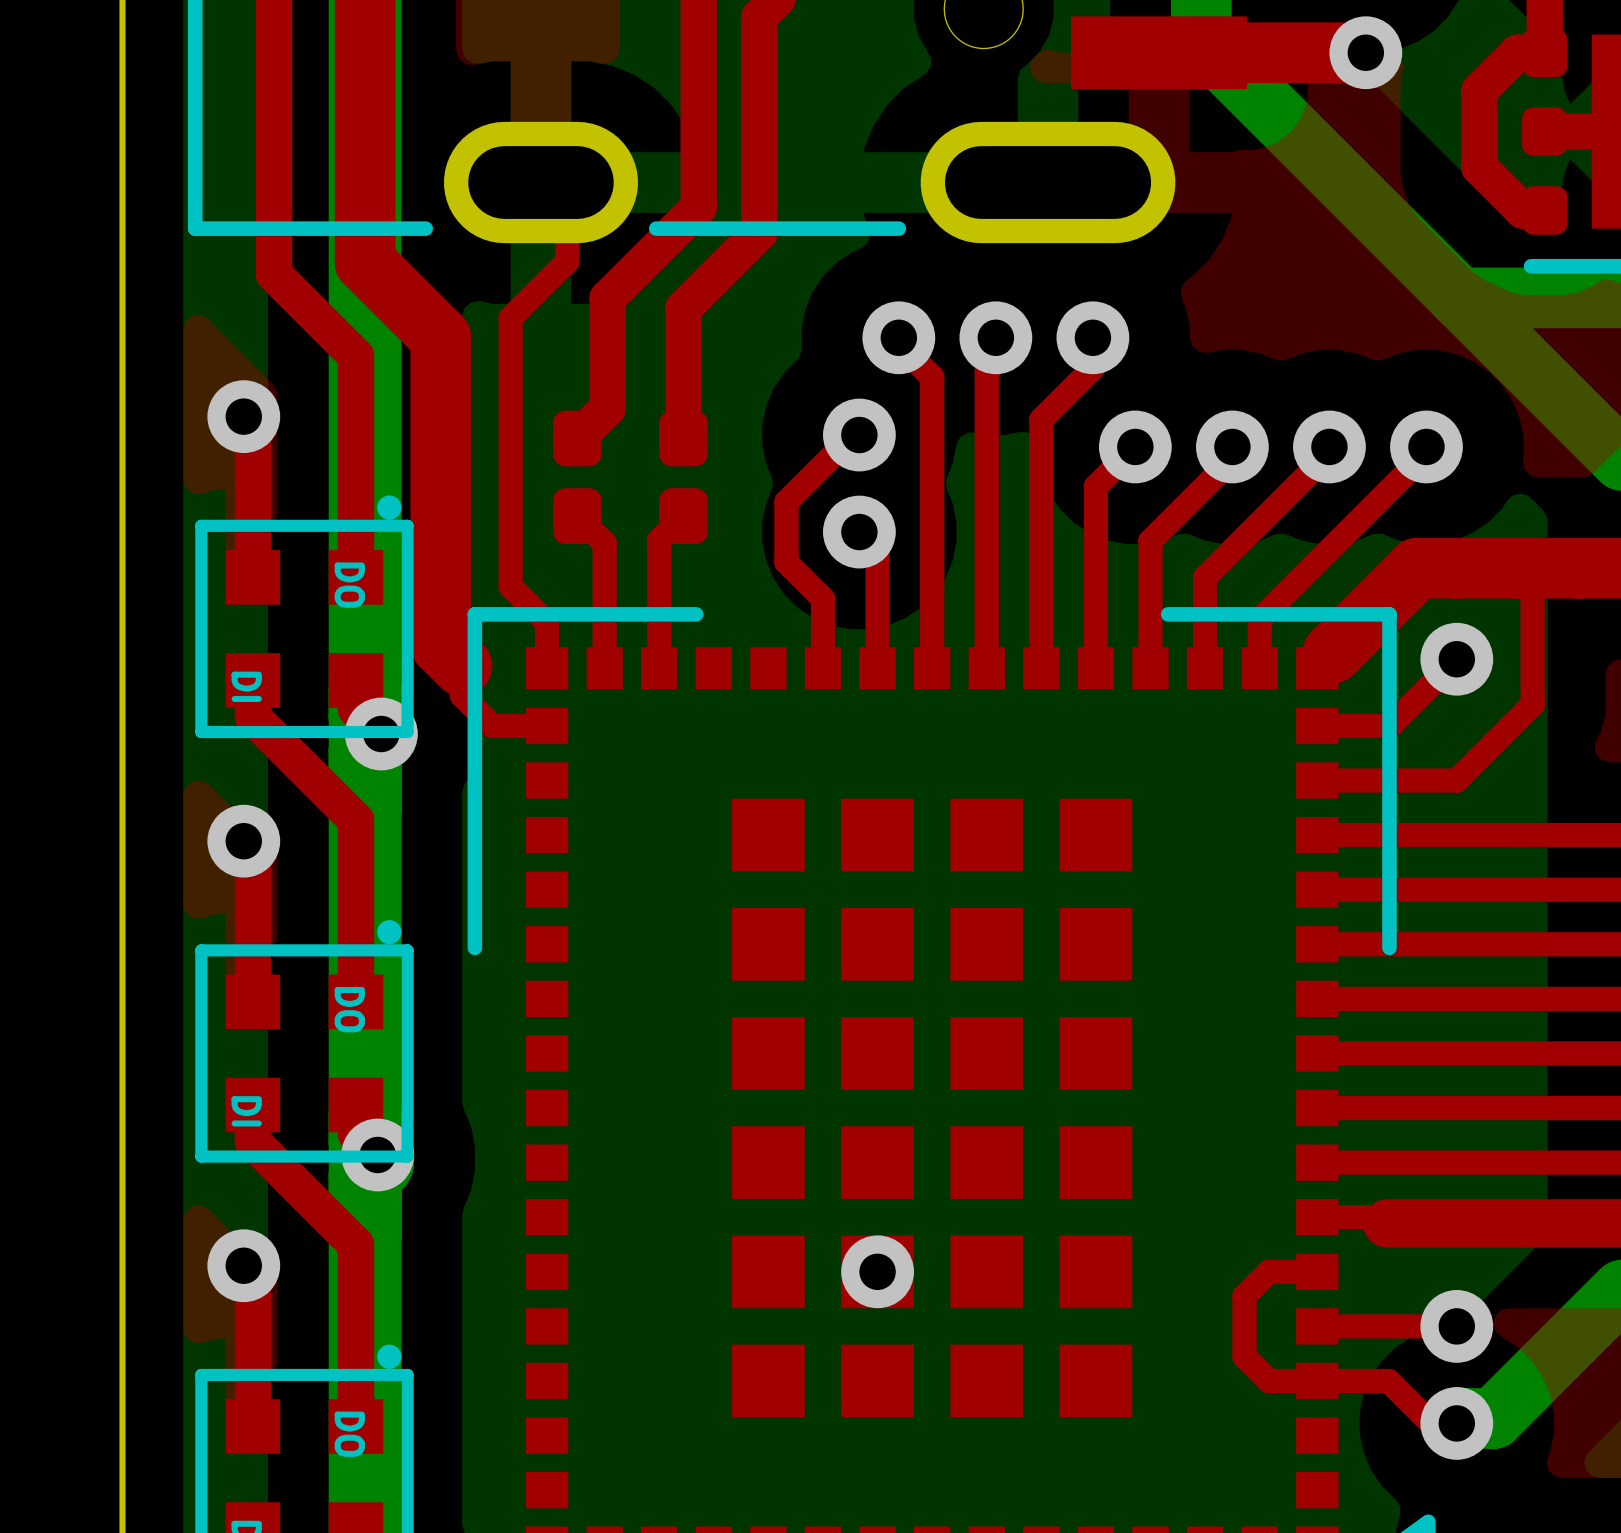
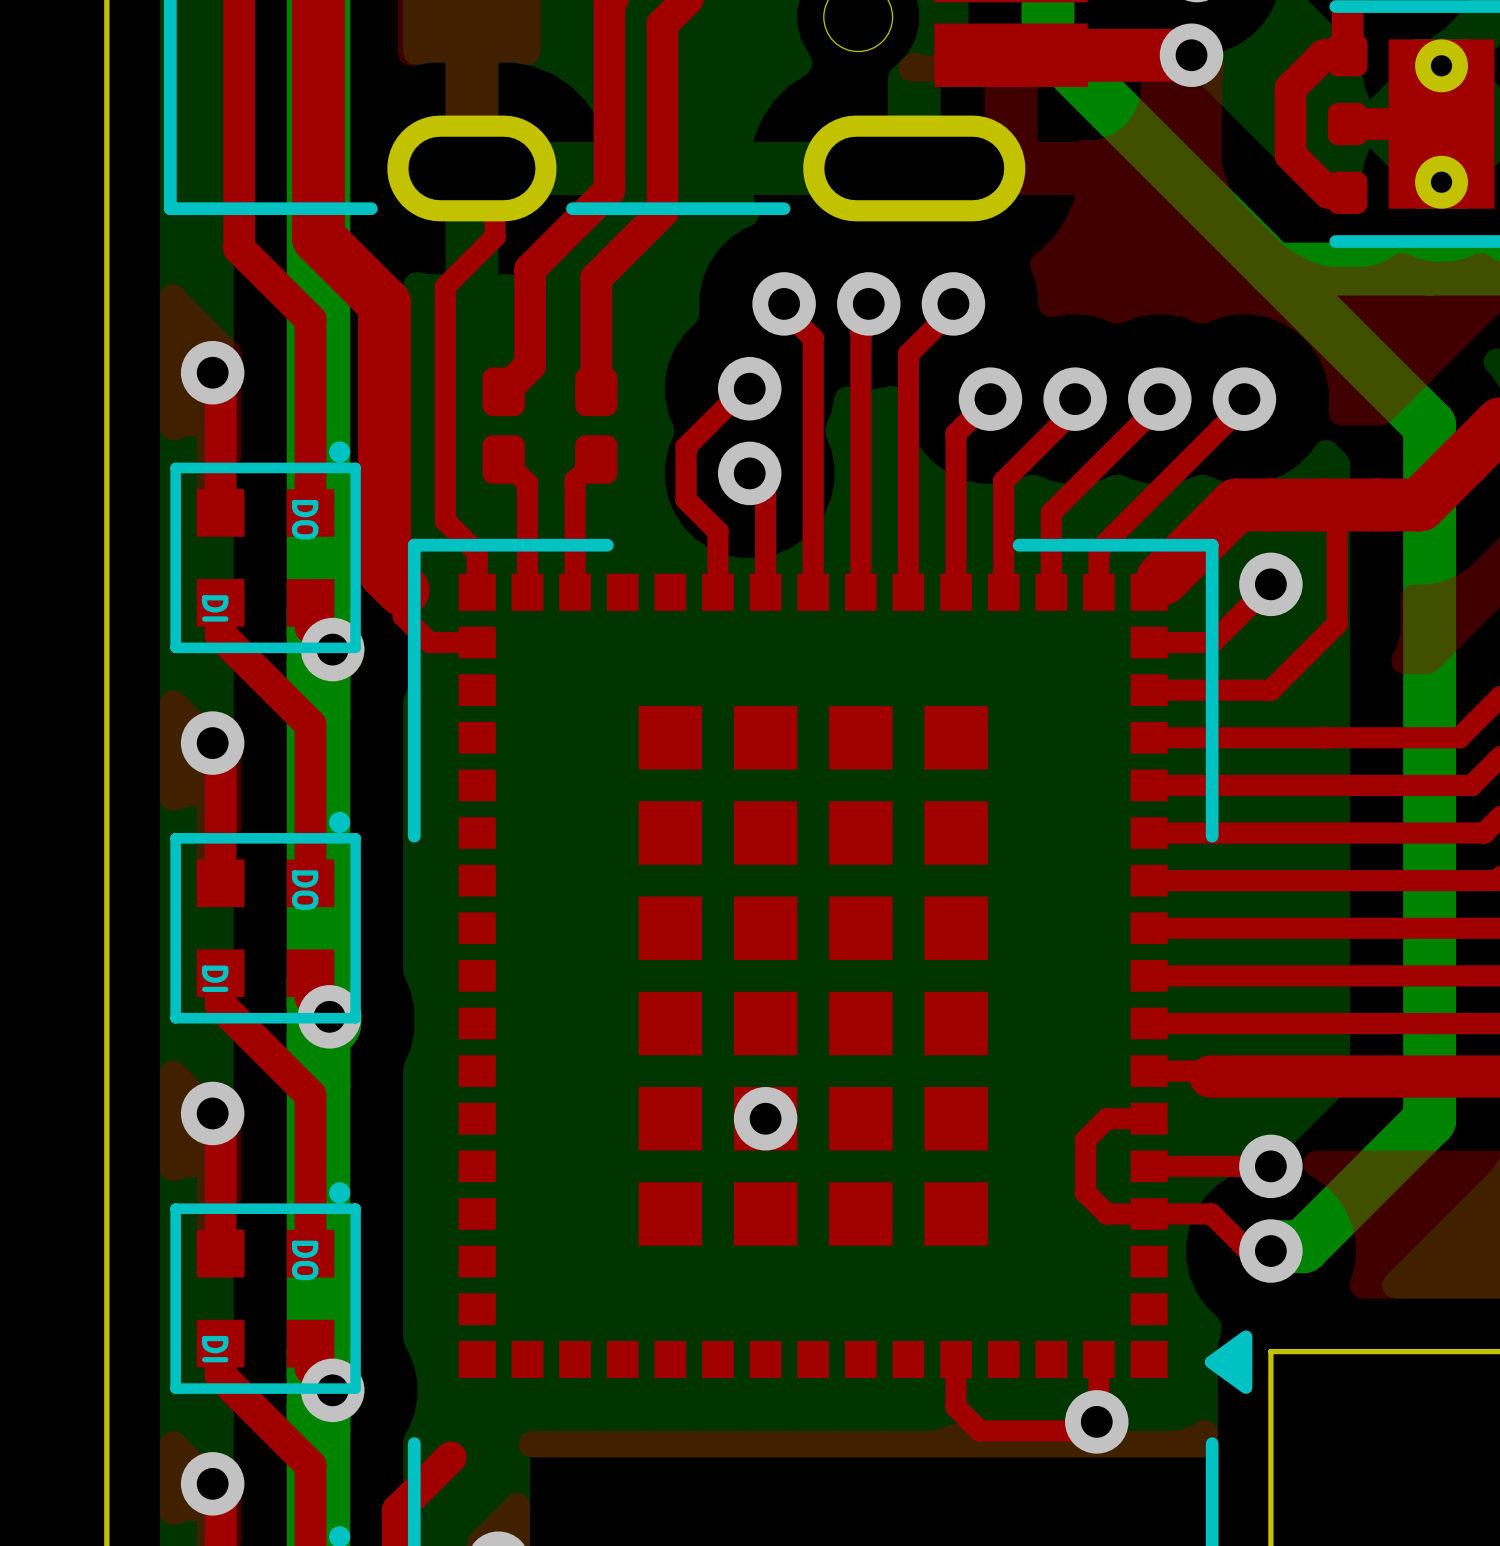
top track: (1092, 343) (1092, 368) (1041, 419) -> (953, 309) (908, 354) (908, 375)

